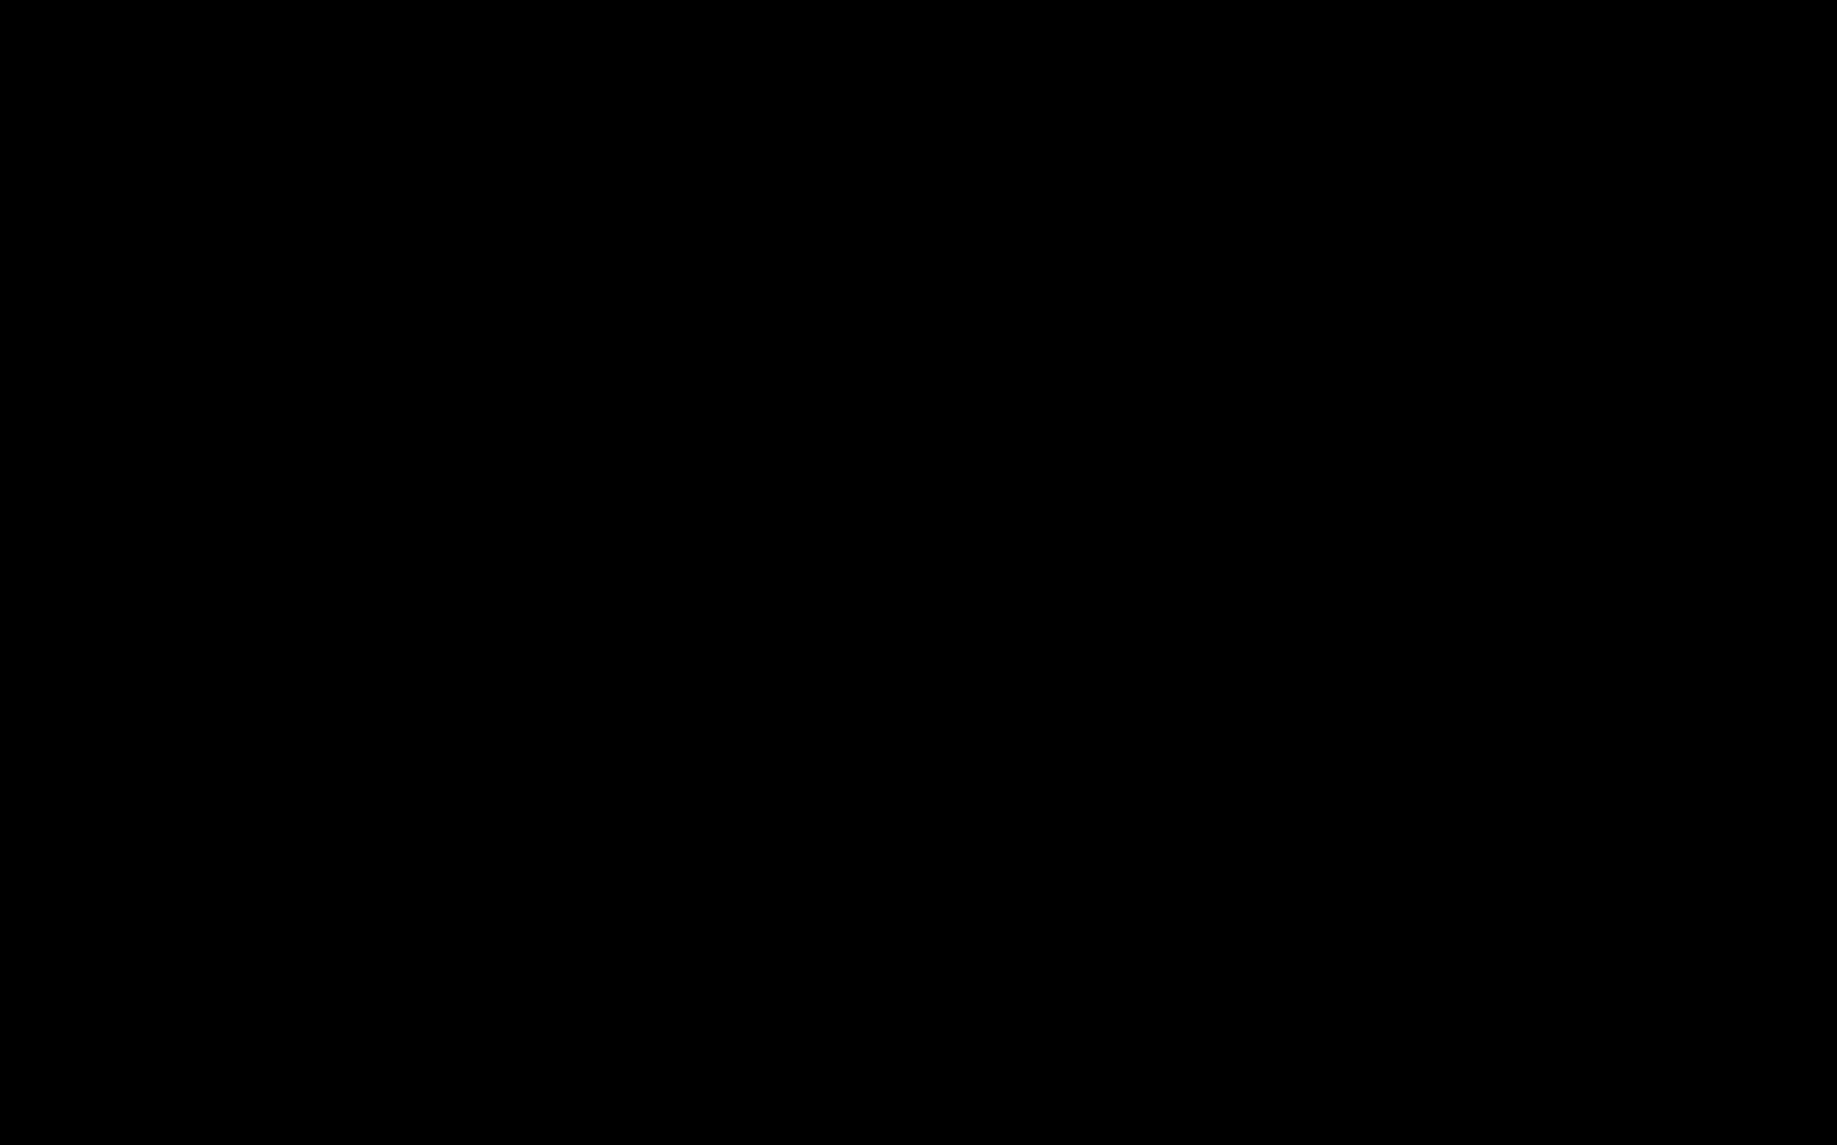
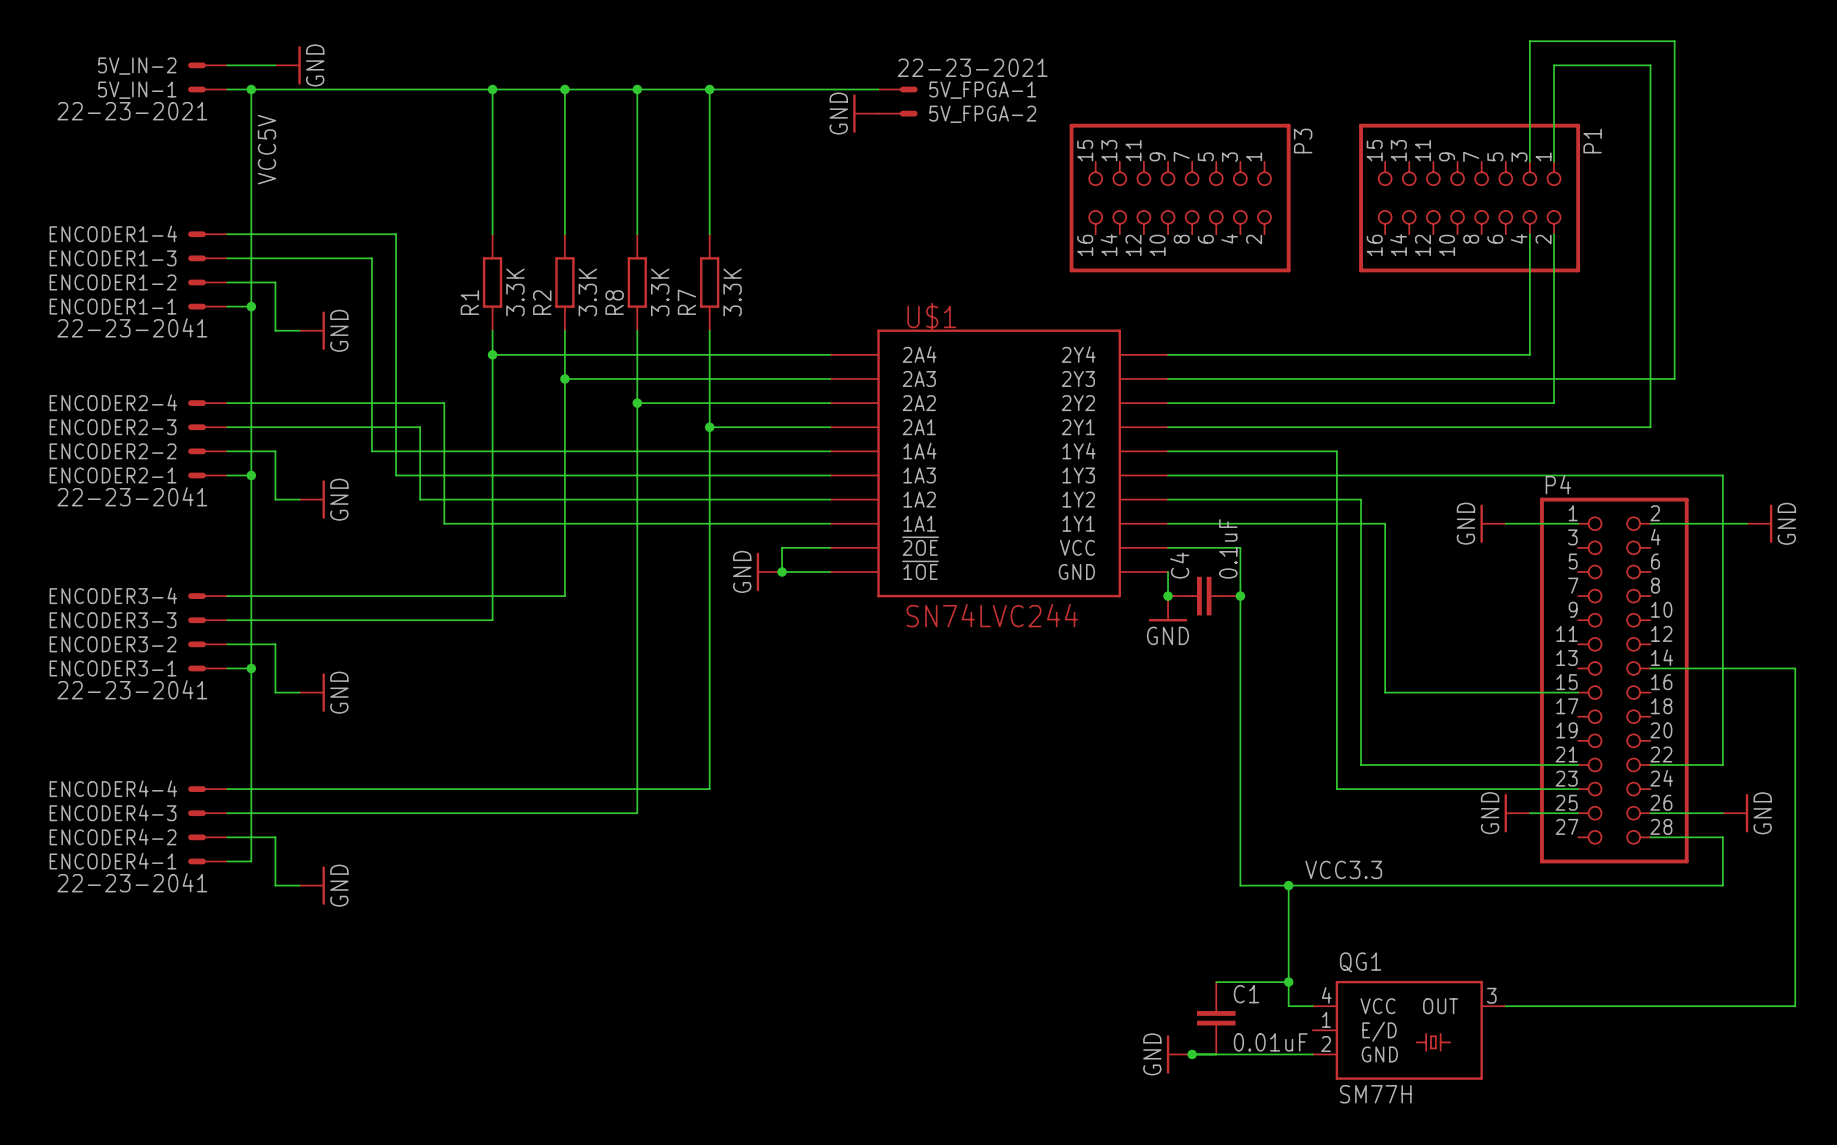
5V_IN-2: none -> (207, 65)
wire: none -> (227, 65) (275, 65)
power symbol: none -> GND (288, 65)
5V_IN-1: none -> 22-23-2021 (207, 89)
wire: none -> (227, 89) (878, 89)
wire: none -> (251, 89) (251, 861) (227, 861)
junction: none -> (251, 89)
wire: none -> (492, 89) (492, 234)
junction: none -> (492, 89)
wire: none -> (564, 89) (564, 234)
junction: none -> (564, 89)
wire: none -> (637, 89) (637, 234)
junction: none -> (637, 89)
wire: none -> (709, 89) (709, 234)
junction: none -> (709, 89)
5V_FPGA-1: none -> 22-23-2021 (898, 89)
power symbol: none -> GND (865, 113)
5V_FPGA-2: none -> (898, 113)
label: none -> VCC5V (267, 149)
wire: none -> (1529, 161) (1529, 41) (1674, 41) (1674, 378) (1168, 378)
wire: none -> (1554, 161) (1554, 65) (1650, 65) (1650, 427) (1168, 427)
P3: none -> (1180, 198)
P1: none -> (1469, 198)
ENCODER1-4: none -> (207, 234)
wire: none -> (227, 234) (396, 234) (396, 475) (830, 475)
wire: none -> (1529, 234) (1529, 354) (1168, 354)
wire: none -> (1554, 234) (1554, 403) (1168, 403)
ENCODER1-3: none -> (207, 258)
wire: none -> (227, 258) (371, 258) (371, 451) (830, 451)
ENCODER1-2: none -> (207, 282)
wire: none -> (227, 282) (275, 282) (275, 330) (299, 330)
R1: none -> 3.3K (492, 282)
R2: none -> 3.3K (564, 282)
R8: none -> 3.3K (637, 282)
R7: none -> 3.3K (709, 282)
ENCODER1-1: none -> 22-23-2041 (207, 306)
wire: none -> (227, 306) (251, 306)
junction: none -> (251, 306)
power symbol: none -> GND (312, 330)
wire: none -> (492, 330) (492, 620) (227, 620)
wire: none -> (564, 330) (564, 596) (227, 596)
wire: none -> (637, 330) (637, 813) (227, 813)
wire: none -> (709, 330) (709, 789) (227, 789)
wire: none -> (492, 354) (830, 354)
junction: none -> (492, 354)
wire: none -> (564, 378) (830, 378)
junction: none -> (564, 378)
ENCODER2-4: none -> (207, 403)
wire: none -> (227, 403) (444, 403) (444, 523) (830, 523)
wire: none -> (637, 403) (830, 403)
junction: none -> (637, 403)
ENCODER2-3: none -> (207, 427)
wire: none -> (227, 427) (420, 427) (420, 499) (830, 499)
wire: none -> (709, 427) (830, 427)
junction: none -> (709, 427)
ENCODER2-2: none -> (207, 451)
wire: none -> (227, 451) (275, 451) (275, 499) (299, 499)
wire: none -> (1168, 451) (1336, 451) (1336, 789) (1578, 789)
U$1: none -> (999, 463)
ENCODER2-1: none -> 22-23-2041 (207, 475)
wire: none -> (227, 475) (251, 475)
junction: none -> (251, 475)
wire: none -> (1168, 475) (1722, 475) (1722, 764) (1650, 764)
power symbol: none -> GND (312, 499)
wire: none -> (1168, 499) (1361, 499) (1361, 764) (1578, 764)
wire: none -> (1168, 523) (1385, 523) (1385, 692) (1578, 692)
power symbol: none -> GND (1493, 523)
wire: none -> (1505, 523) (1578, 523)
wire: none -> (1650, 523) (1747, 523)
power symbol: none -> GND (1759, 523)
wire: none -> (830, 547) (782, 547) (782, 571) (830, 571)
wire: none -> (1168, 547) (1240, 547) (1240, 885) (1722, 885) (1722, 837) (1650, 837)
power symbol: none -> GND (769, 571)
junction: none -> (782, 571)
wire: none -> (1168, 571) (1168, 596)
ENCODER3-4: none -> (207, 596)
junction: none -> (1168, 596)
C4: none -> 0.1uF (1204, 596)
junction: none -> (1240, 596)
power symbol: none -> GND (1168, 608)
ENCODER3-3: none -> (207, 620)
ENCODER3-2: none -> (207, 644)
wire: none -> (227, 644) (275, 644) (275, 692) (299, 692)
ENCODER3-1: none -> 22-23-2041 (207, 668)
wire: none -> (227, 668) (251, 668)
junction: none -> (251, 668)
wire: none -> (1650, 668) (1795, 668) (1795, 1006) (1505, 1006)
P4: none -> (1614, 680)
power symbol: none -> GND (312, 692)
ENCODER4-4: none -> (207, 789)
ENCODER4-3: none -> (207, 813)
power symbol: none -> GND (1517, 813)
wire: none -> (1529, 813) (1578, 813)
wire: none -> (1650, 813) (1722, 813)
power symbol: none -> GND (1735, 813)
ENCODER4-2: none -> (207, 837)
wire: none -> (227, 837) (275, 837) (275, 885) (299, 885)
ENCODER4-1: none -> 22-23-2041 (207, 861)
label: none -> VCC3.3 (1343, 869)
power symbol: none -> GND (312, 885)
wire: none -> (1288, 885) (1288, 1006) (1312, 1006)
junction: none -> (1288, 885)
wire: none -> (1216, 982) (1288, 982)
junction: none -> (1288, 982)
C1: none -> 0.01uF (1216, 1018)
QG1: none -> SM77H (1409, 1030)
power symbol: none -> GND (1179, 1054)
wire: none -> (1192, 1054) (1312, 1054)
junction: none -> (1192, 1054)

